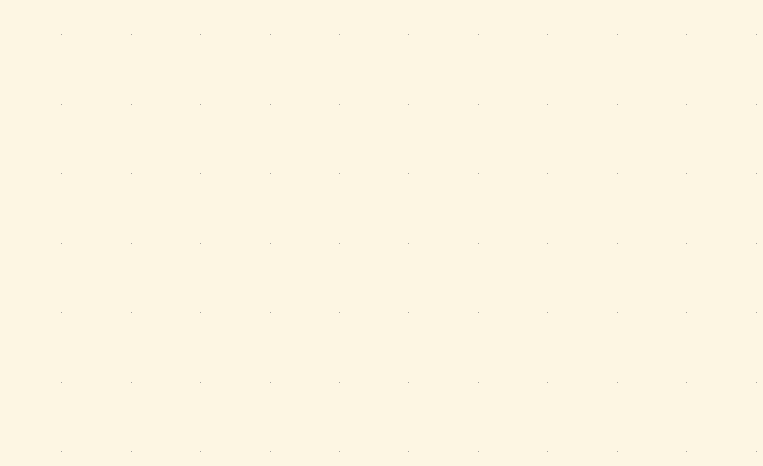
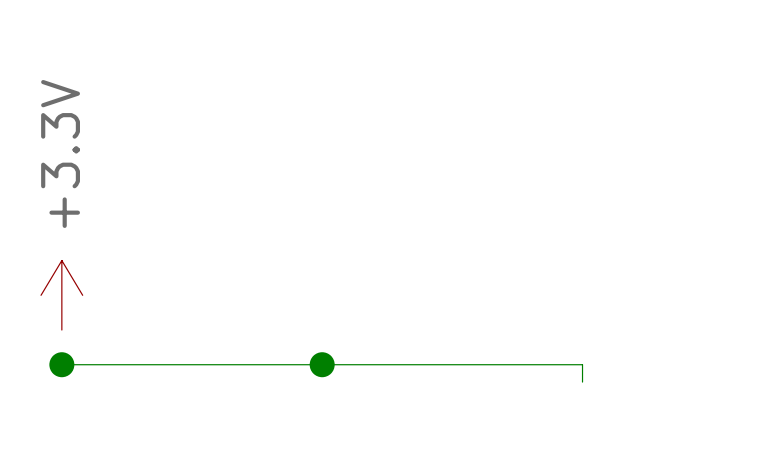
power symbol: none -> +3.3V (61, 295)
wire: none -> (61, 364) (582, 364) (582, 382)
junction: none -> (61, 364)
junction: none -> (322, 364)

